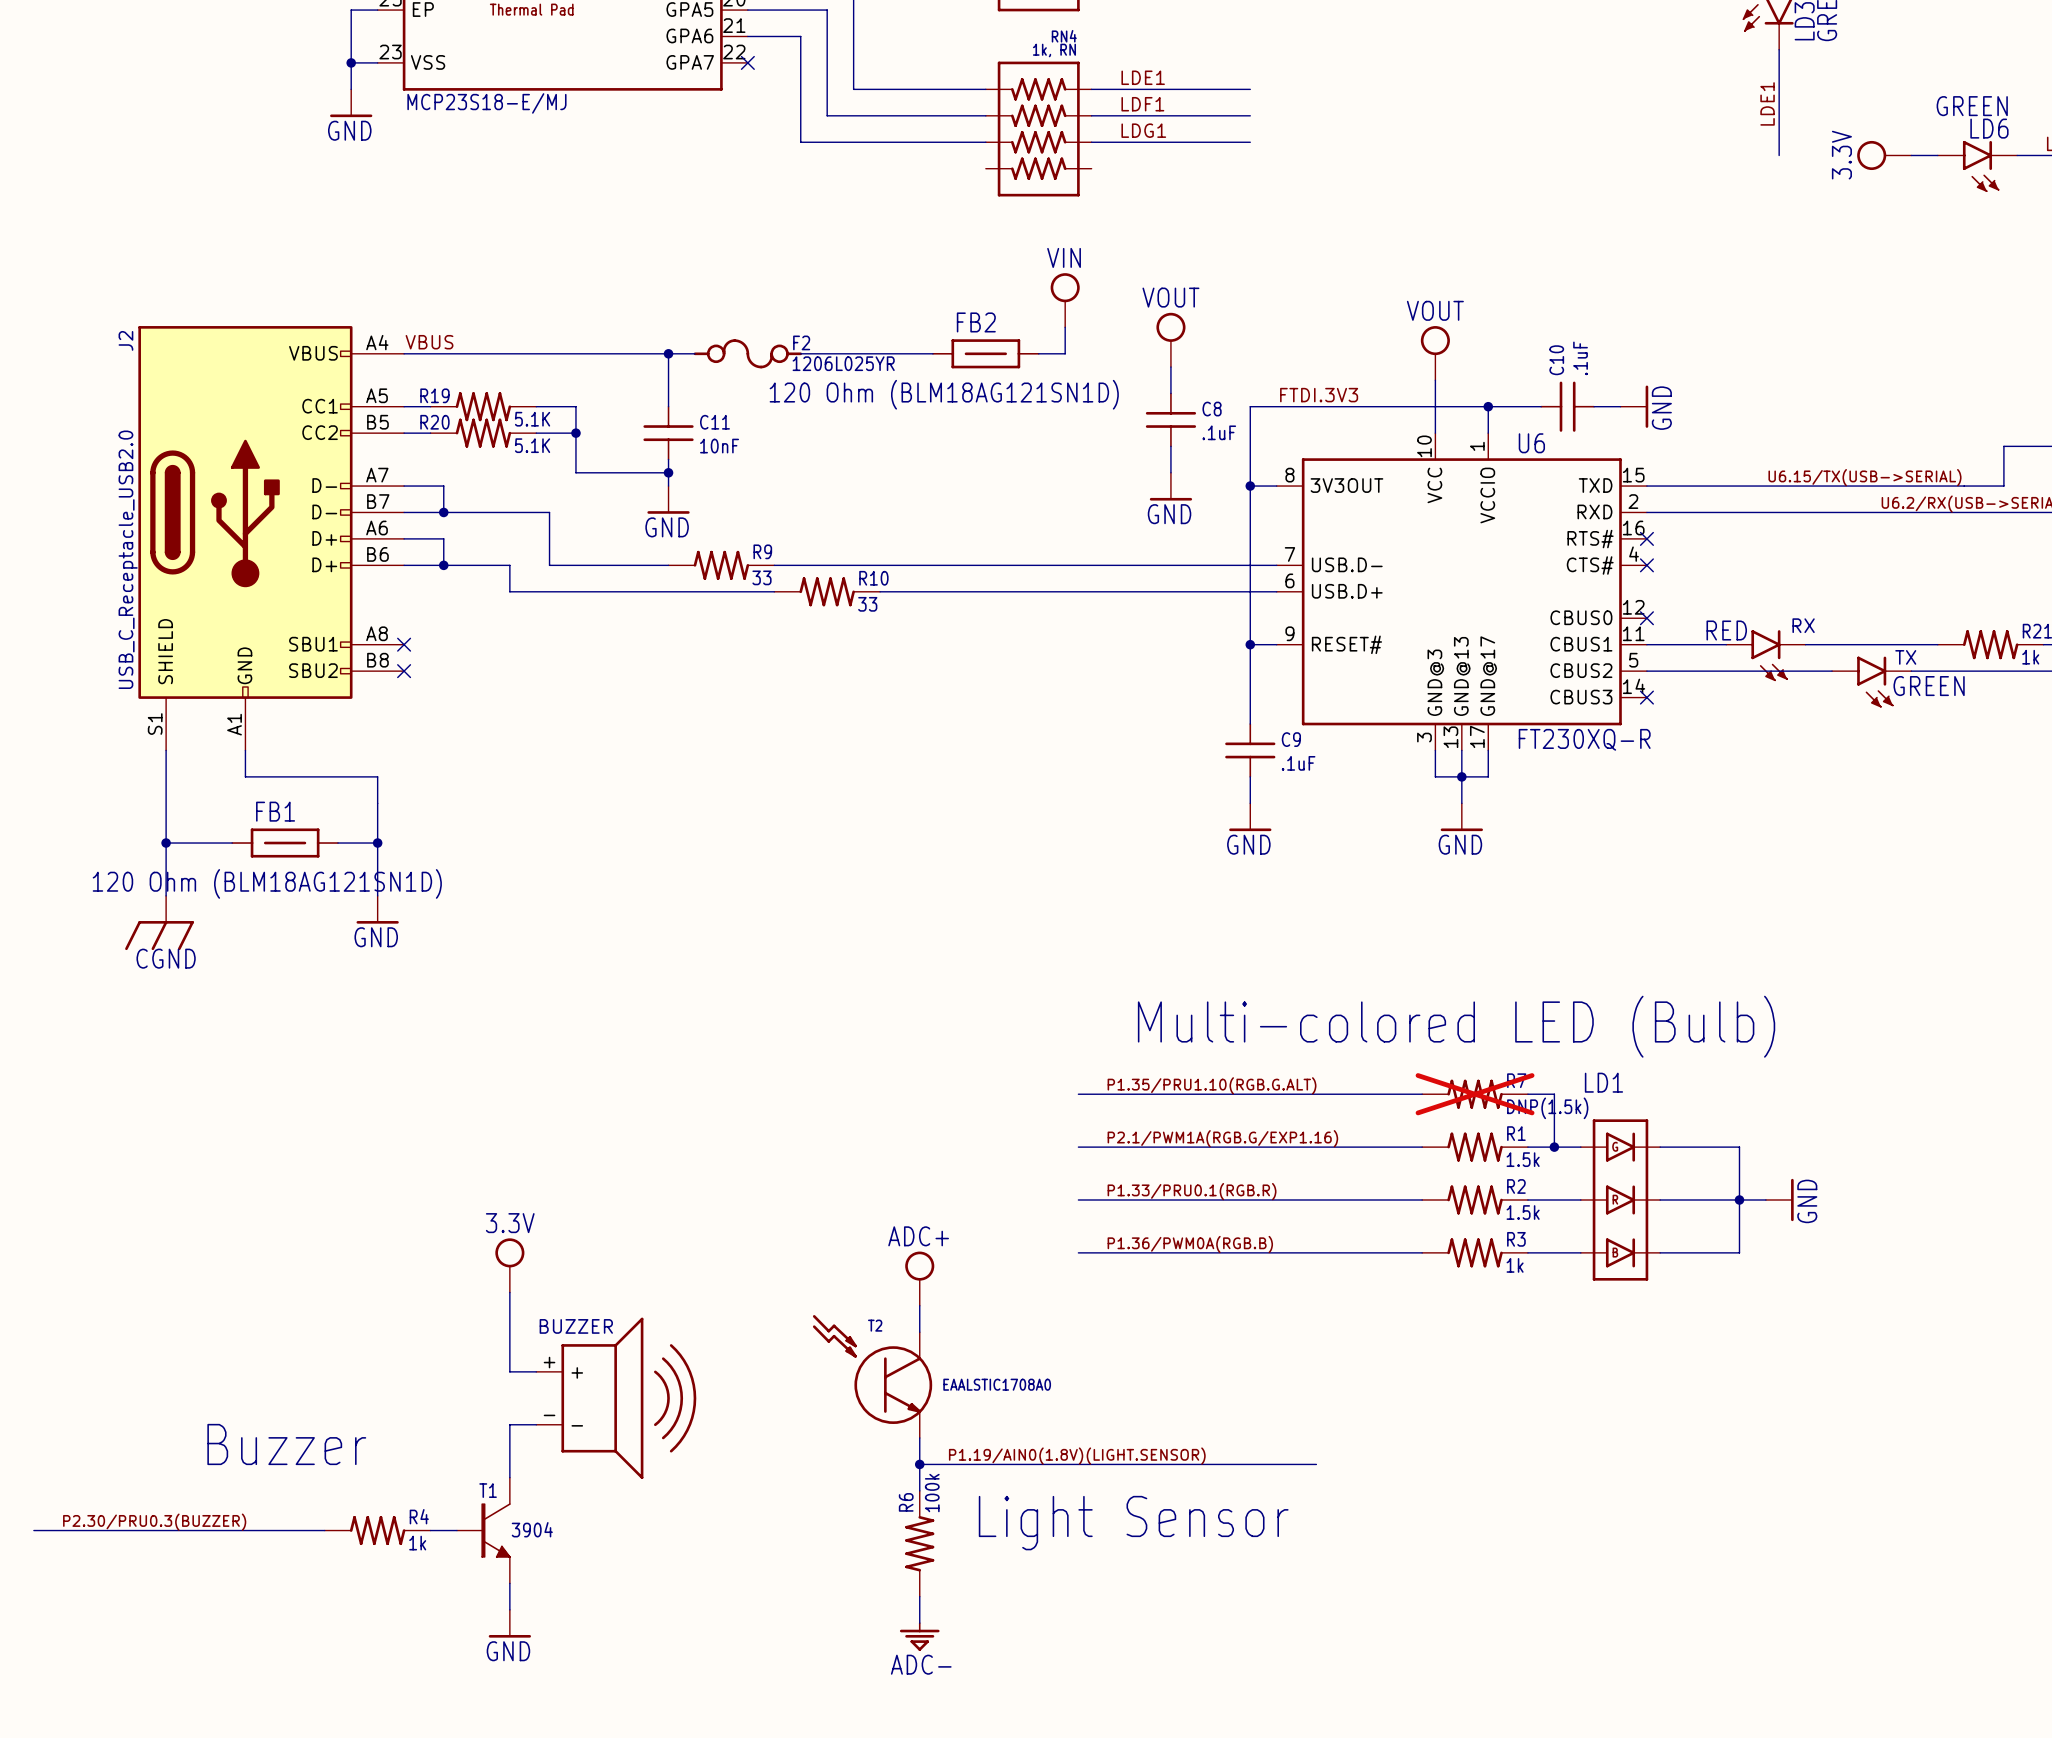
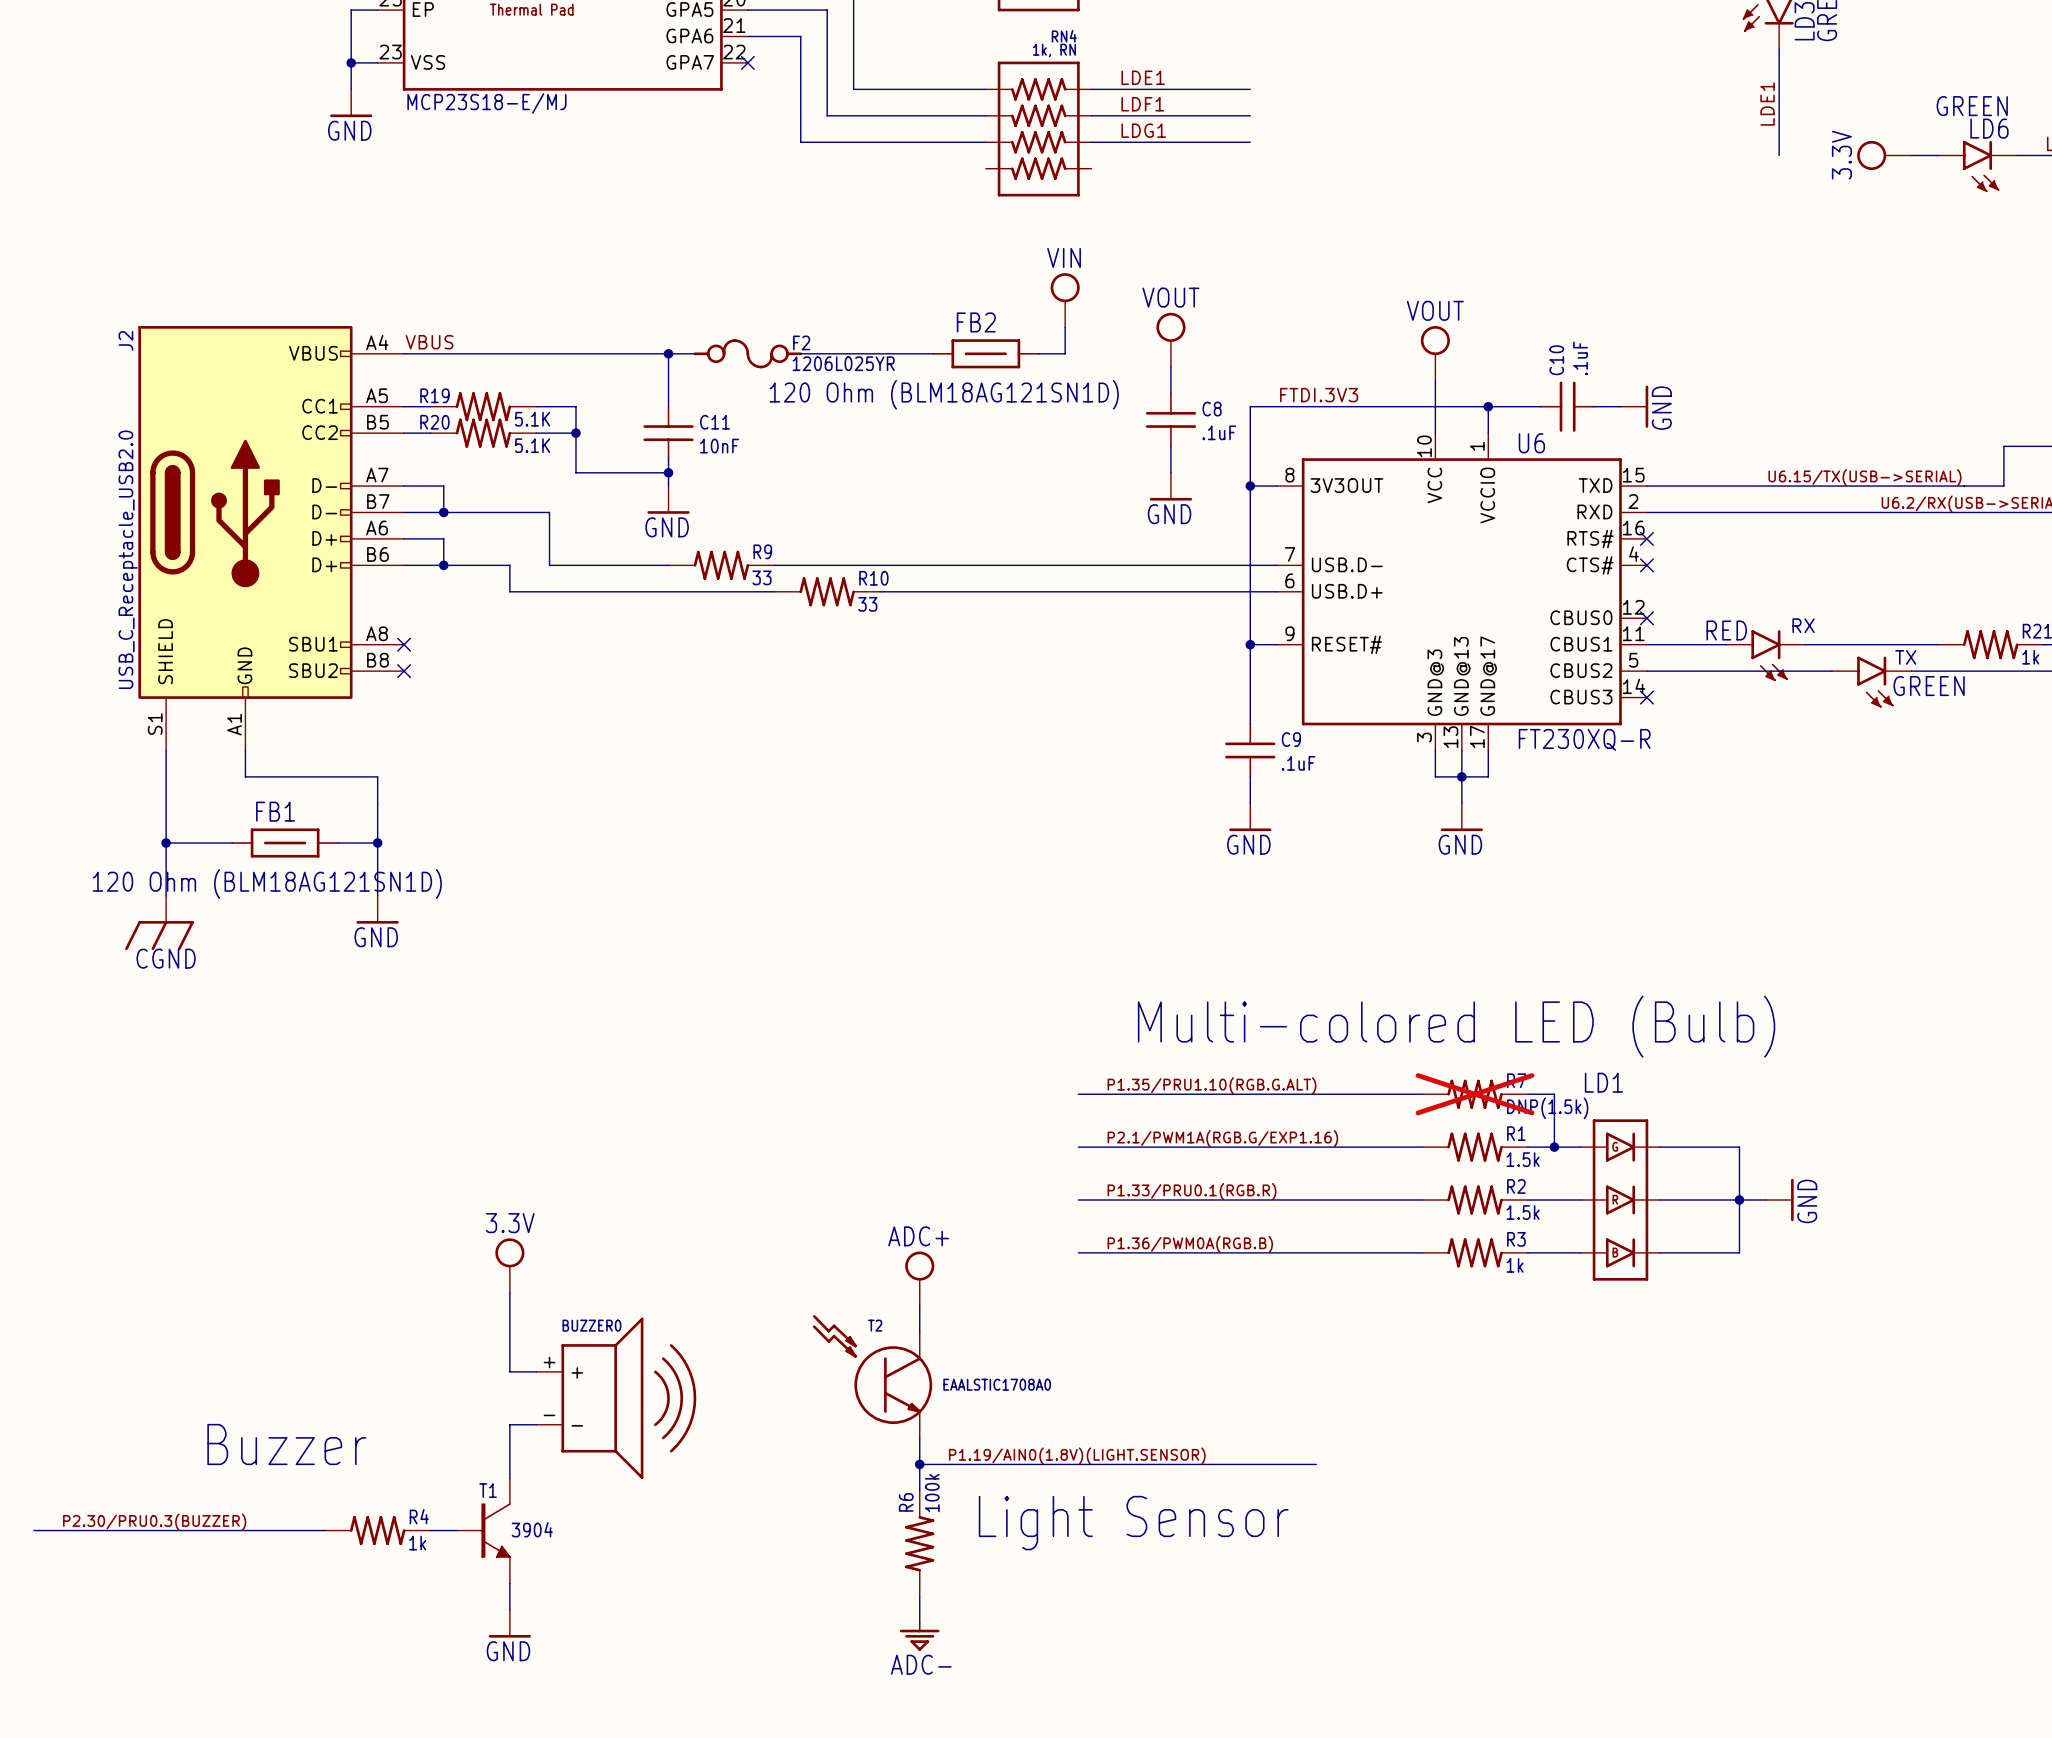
BUZZER0 name: none -> BUZZER0 (591, 1325)
BUZZER0 text: BUZZER (576, 1326) -> none

